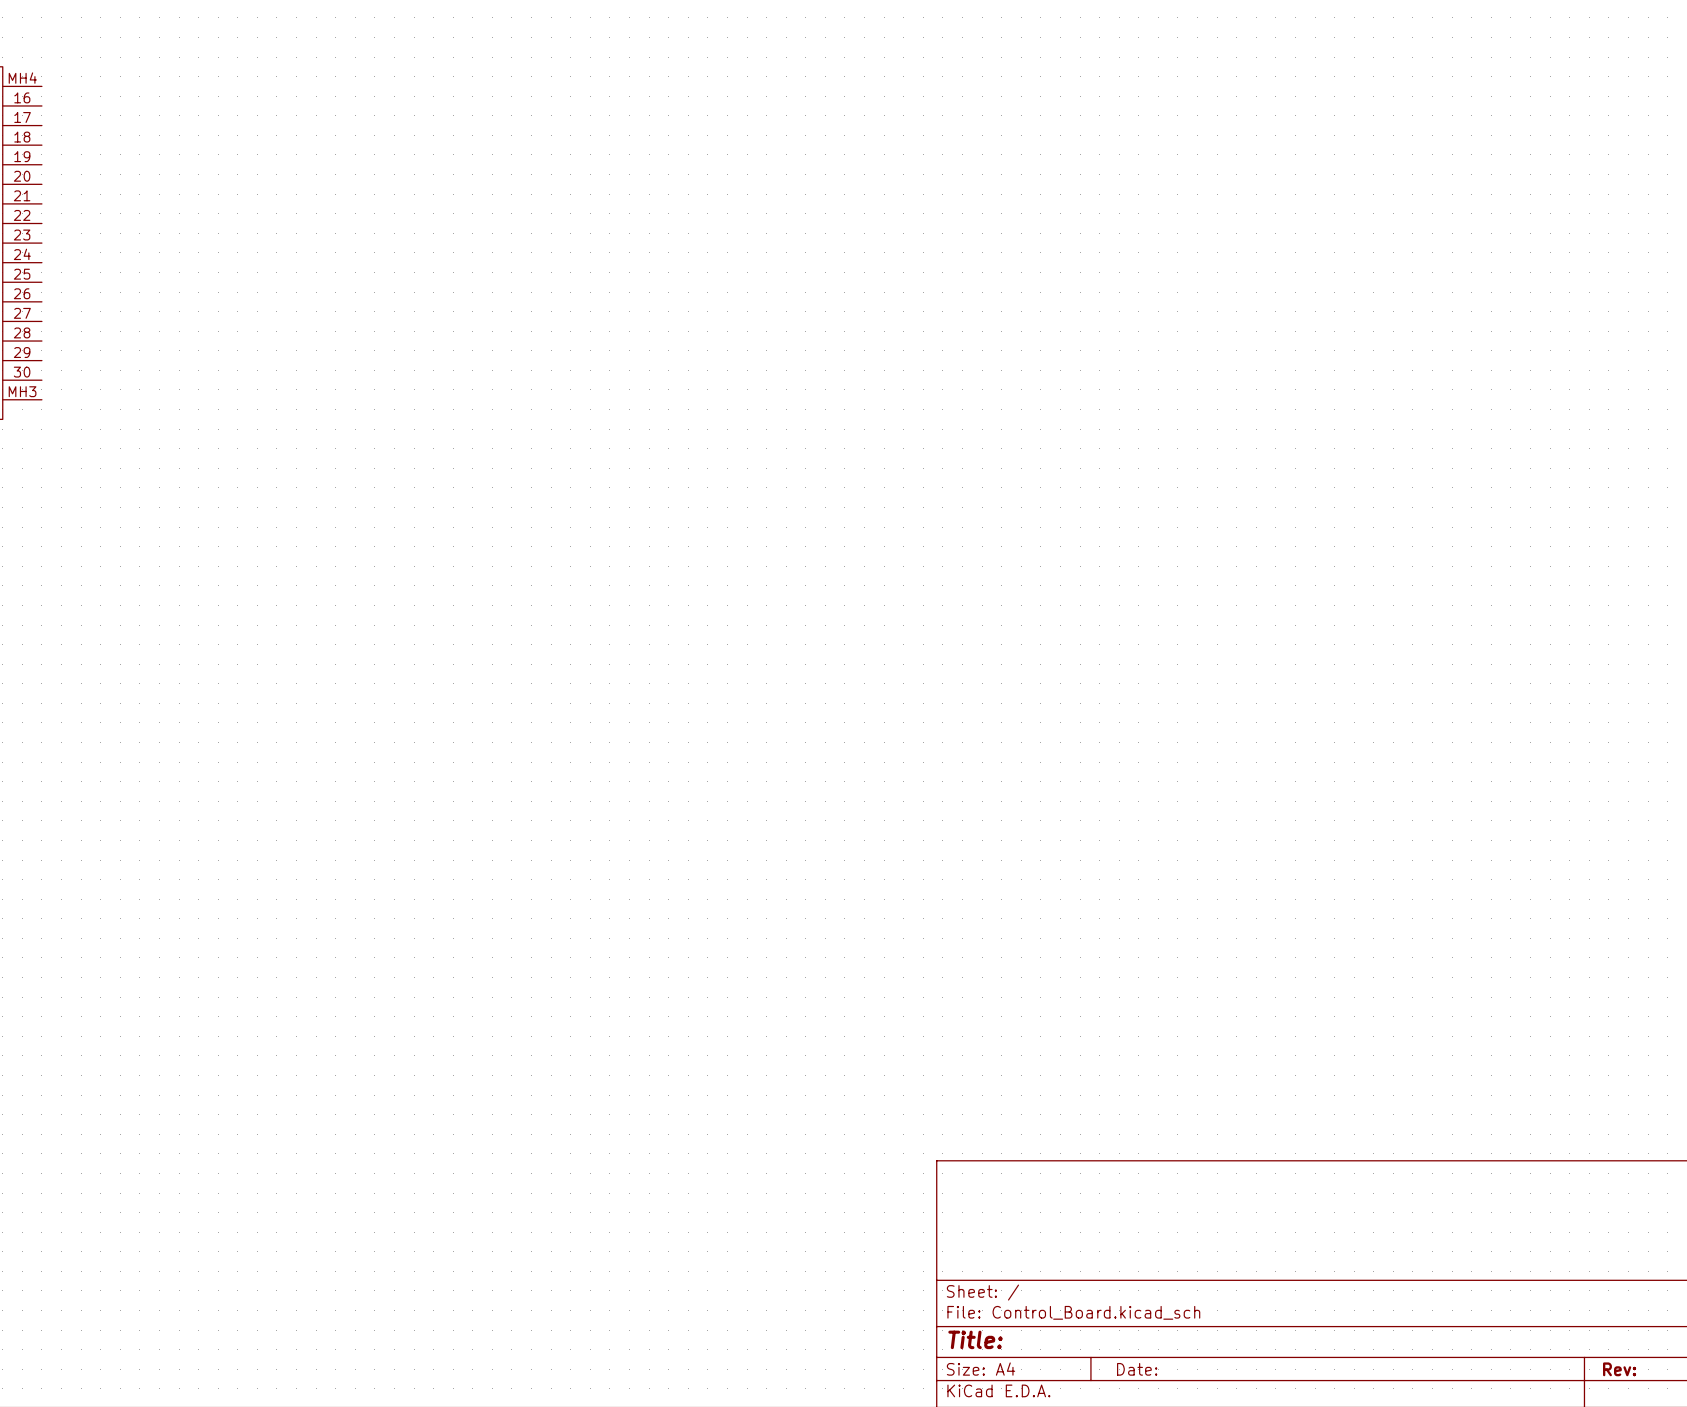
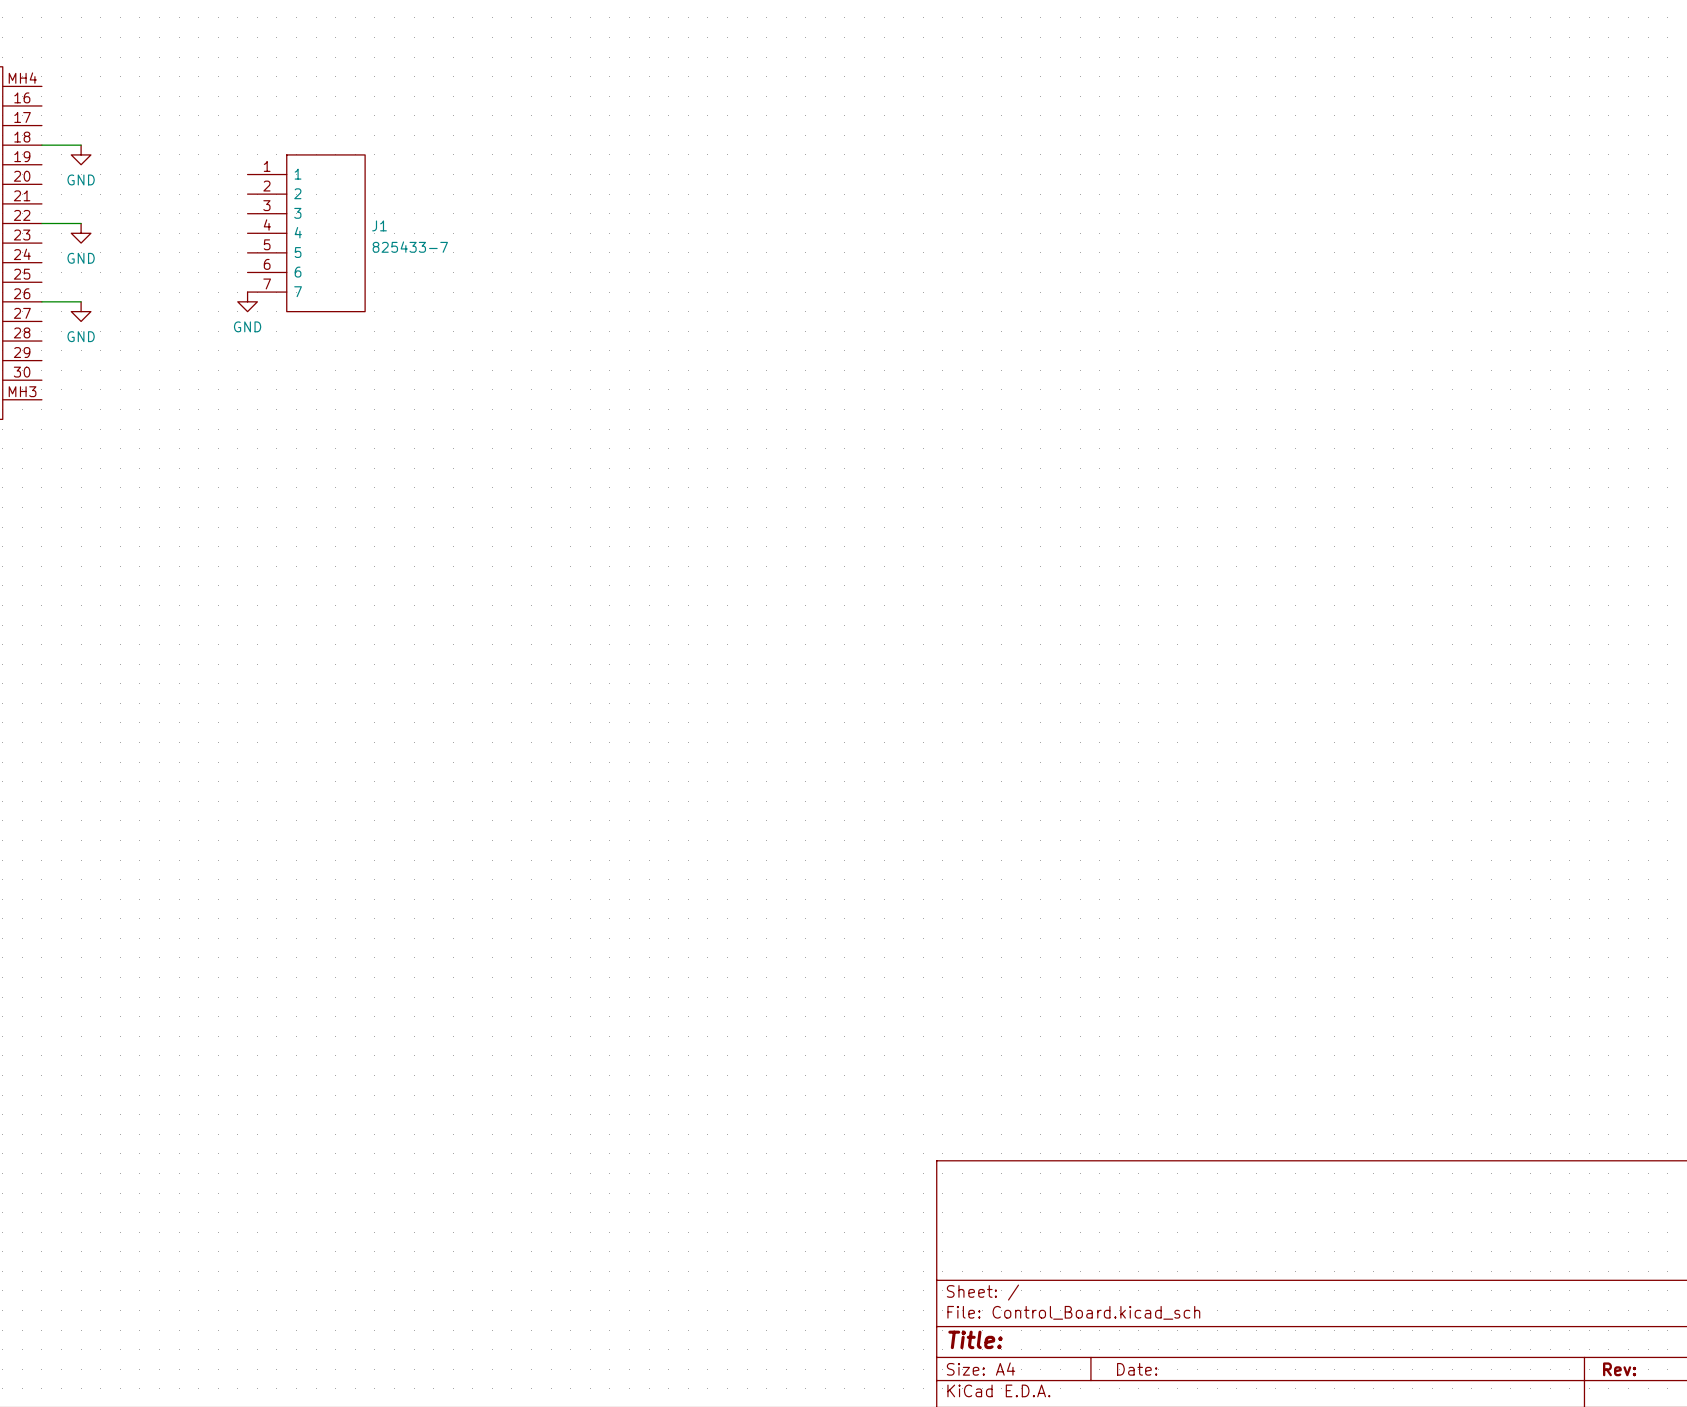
wire: none -> (41, 145) (81, 145)
power symbol: none -> GND (81, 154)
wire: none -> (41, 223) (81, 223)
power symbol: none -> GND (81, 233)
J1: none -> 825433-7 (306, 233)
wire: none -> (41, 301) (81, 301)
power symbol: none -> GND (247, 301)
power symbol: none -> GND (81, 311)

